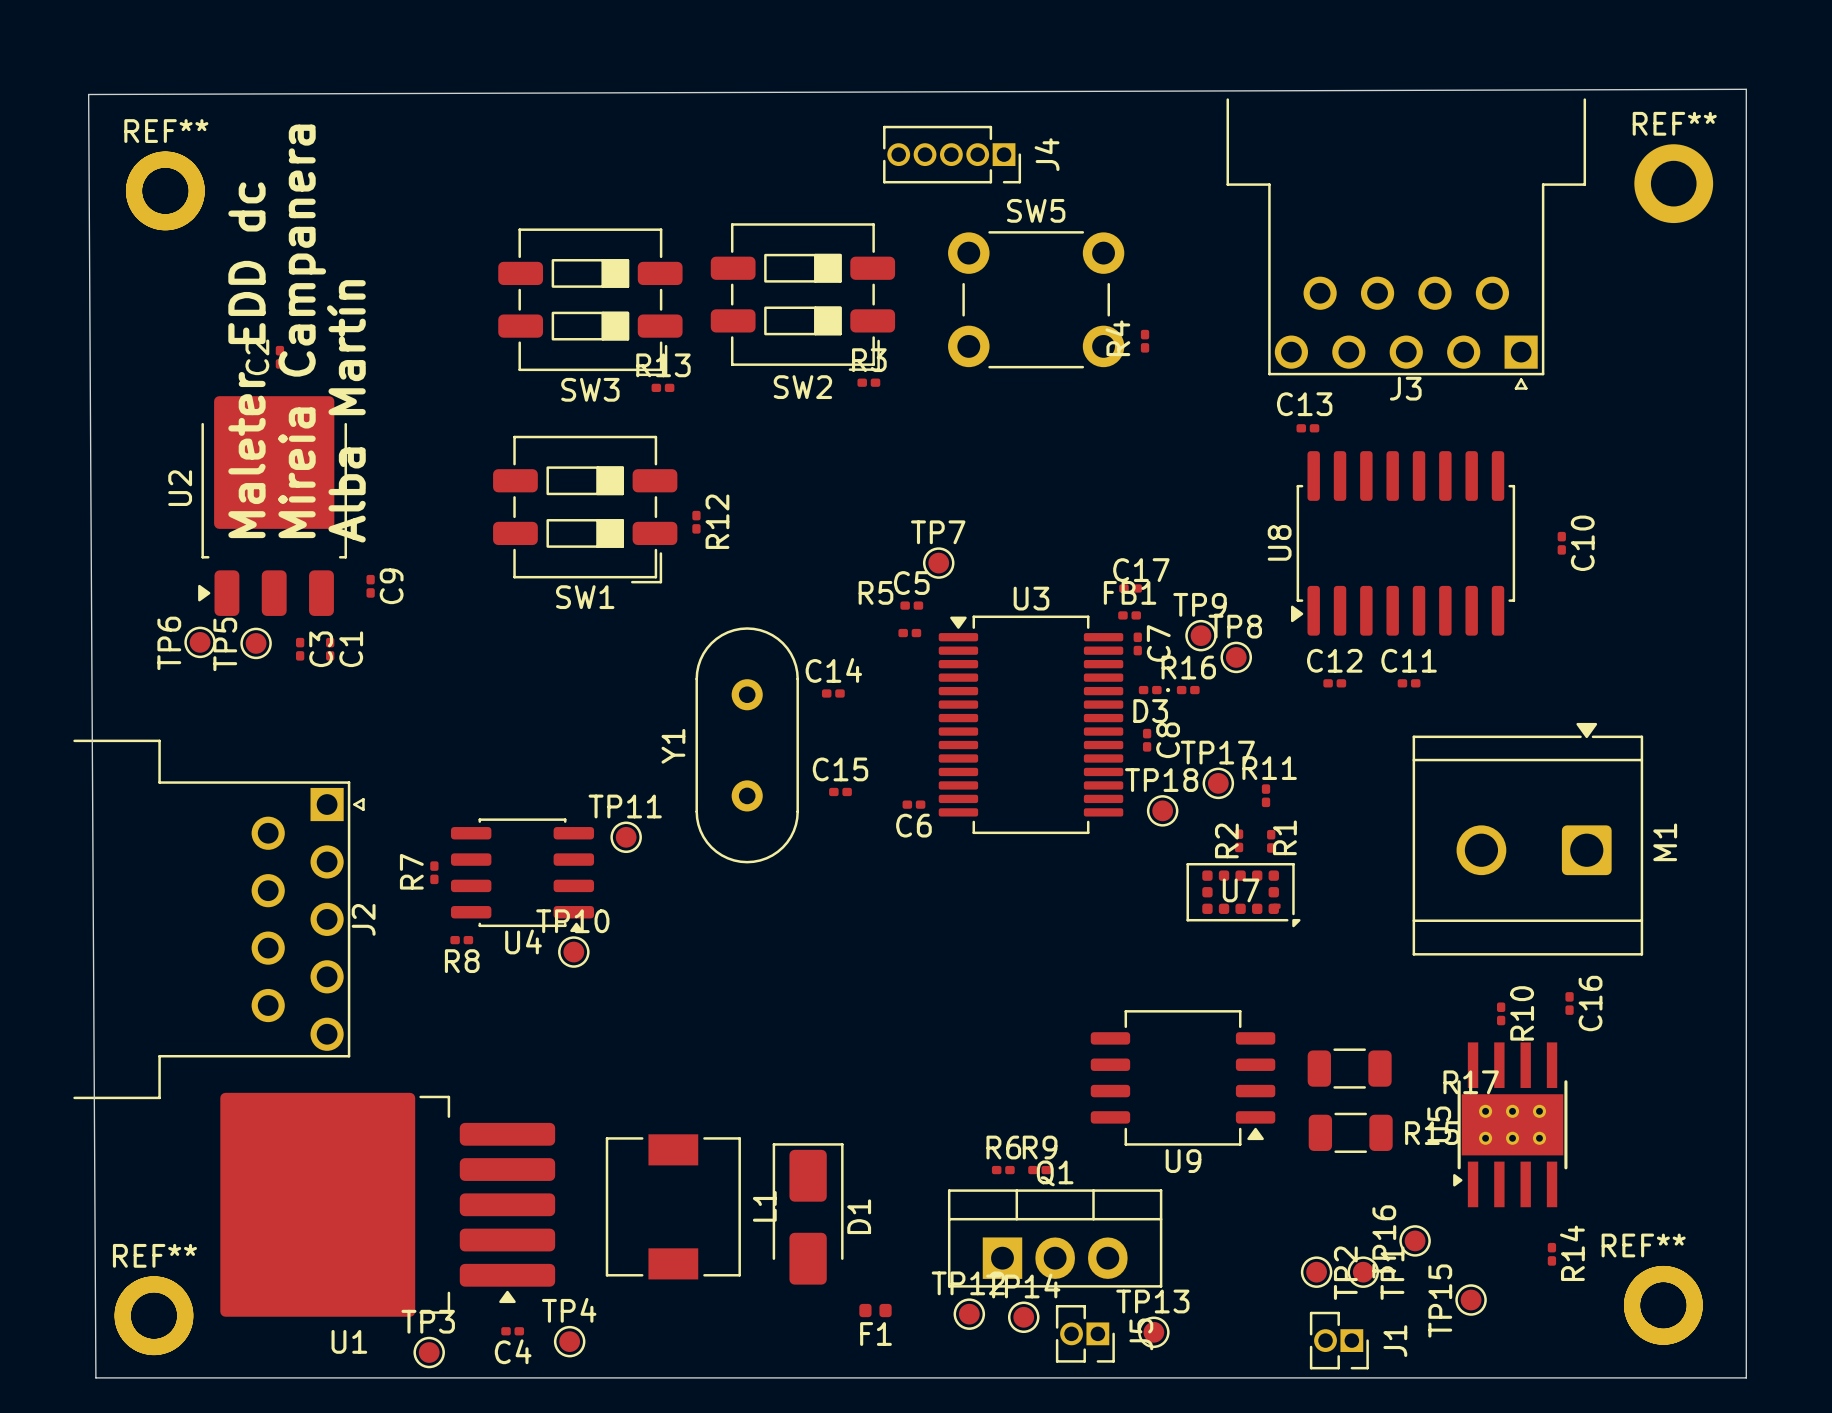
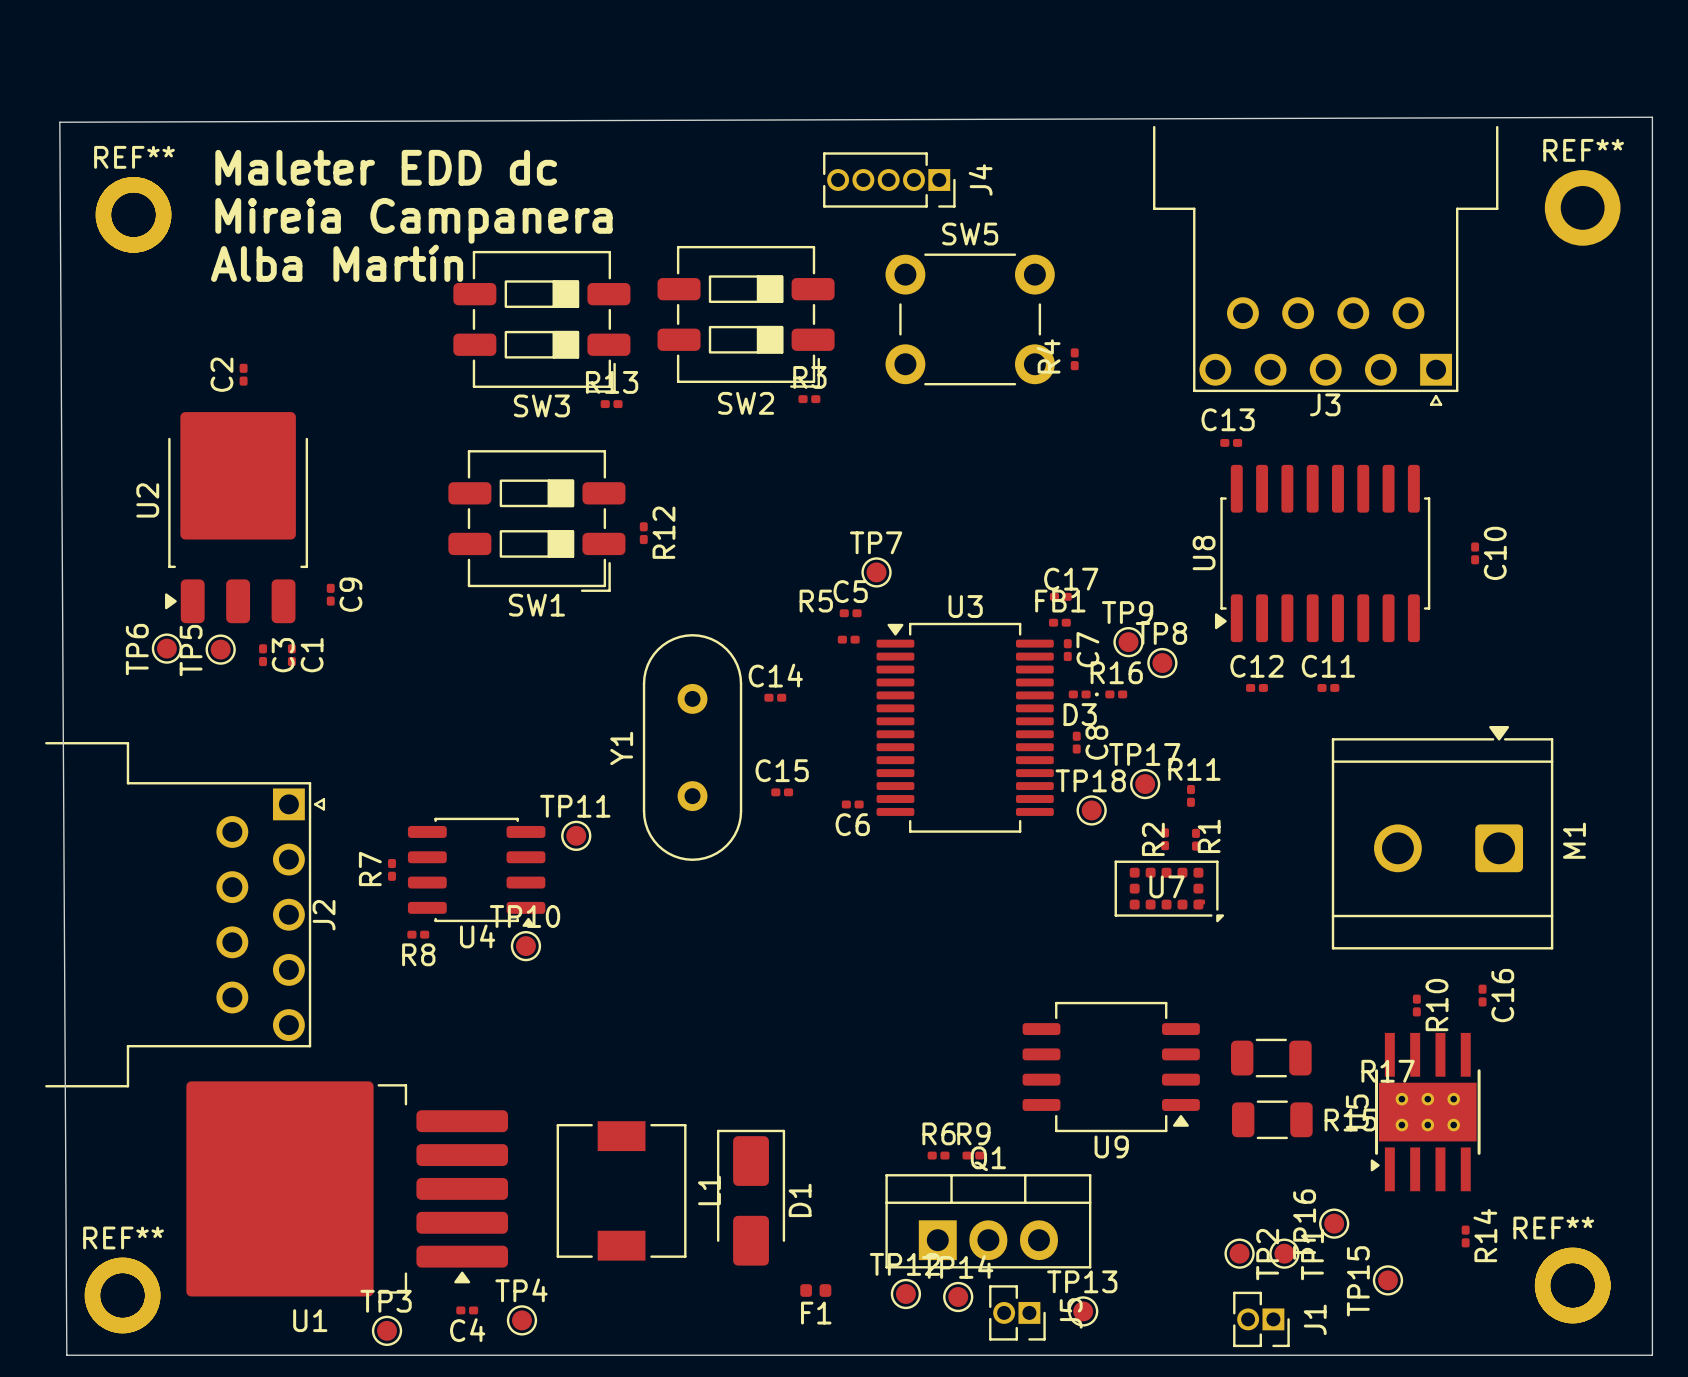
text rotation: 0° (302, 331) -> 90° clockwise (413, 220)
text rotation: 0° (246, 360) -> 90° clockwise (386, 167)
text rotation: 0° (346, 411) -> 90° clockwise (337, 263)

